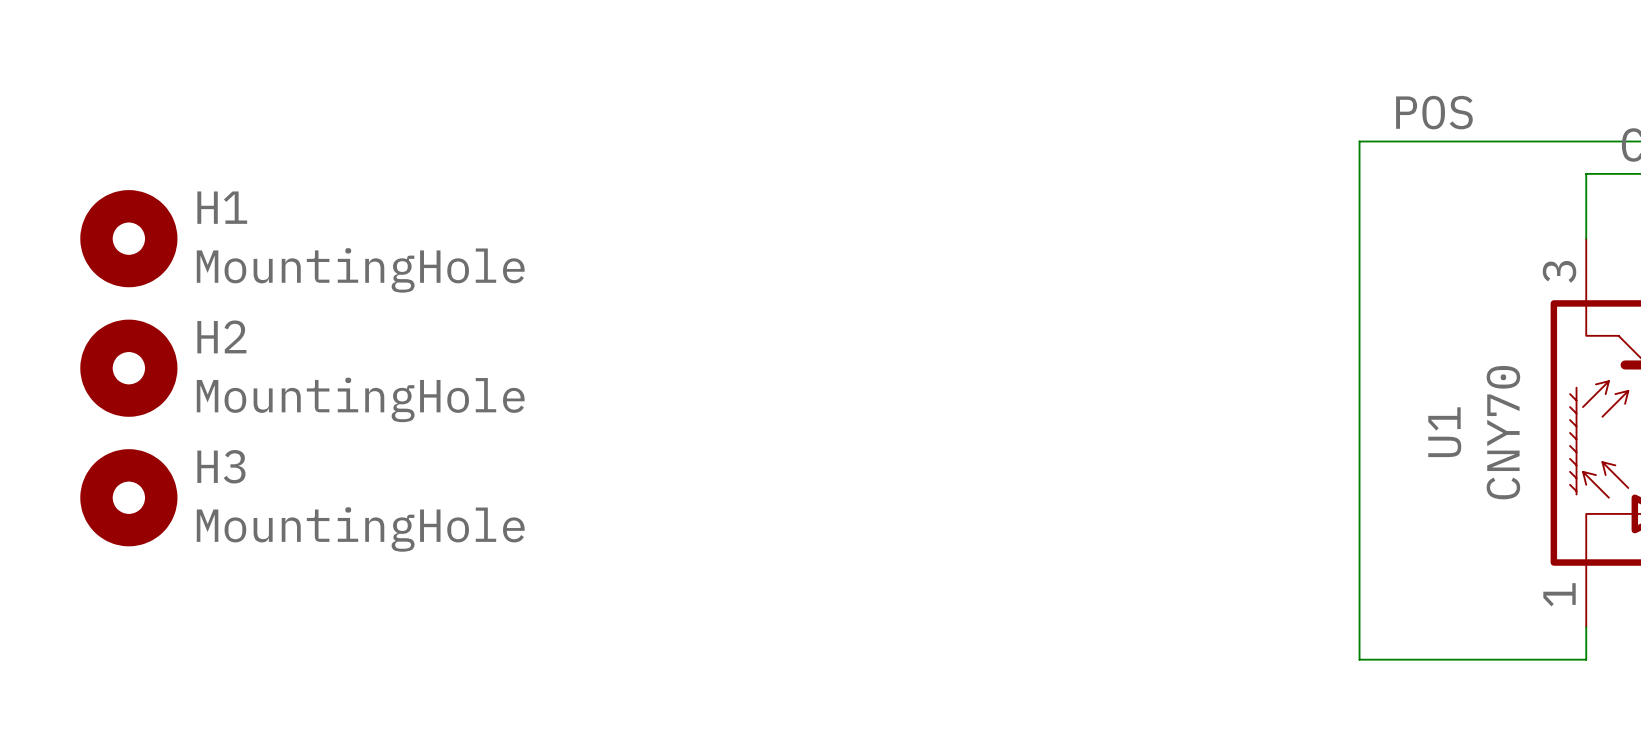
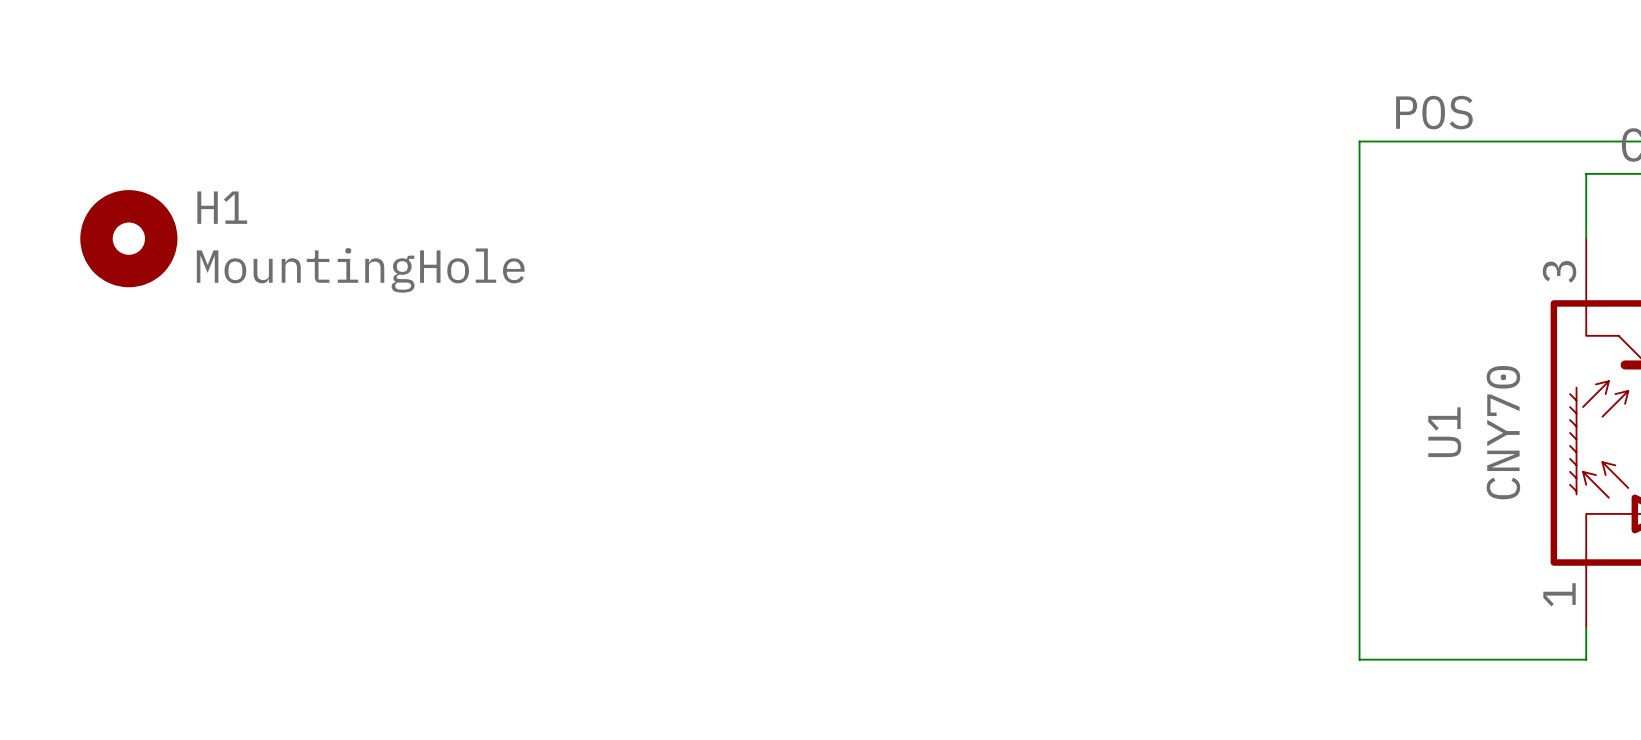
H2: MountingHole (128, 368) -> none
H3: MountingHole (128, 497) -> none

